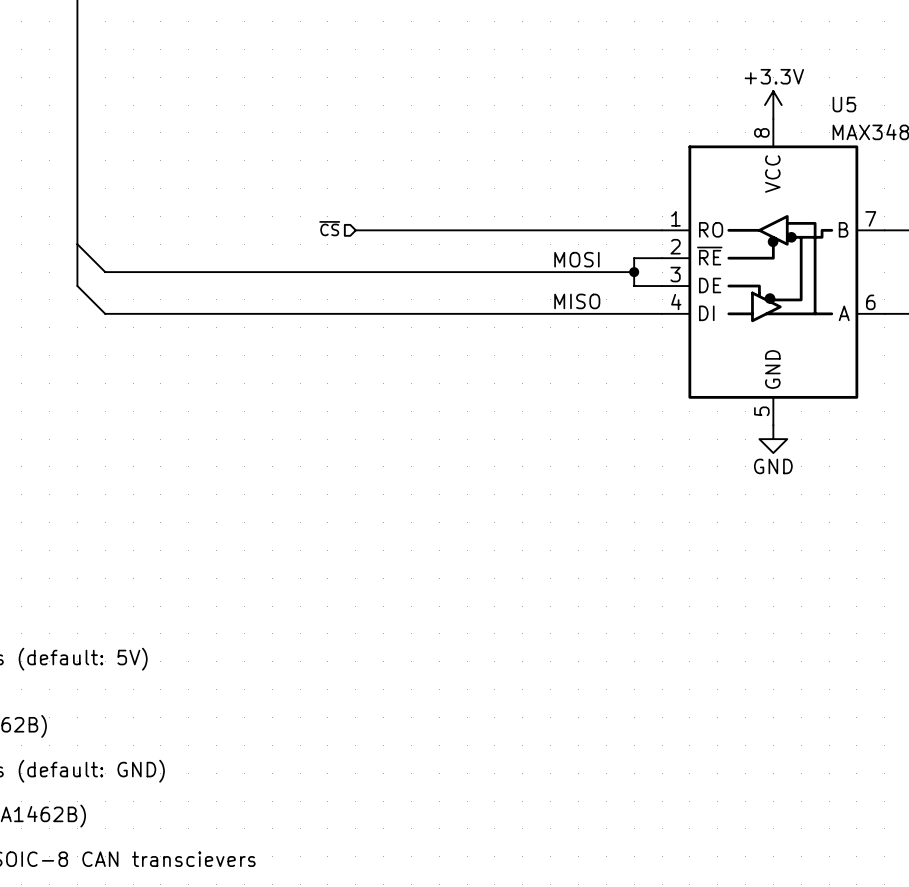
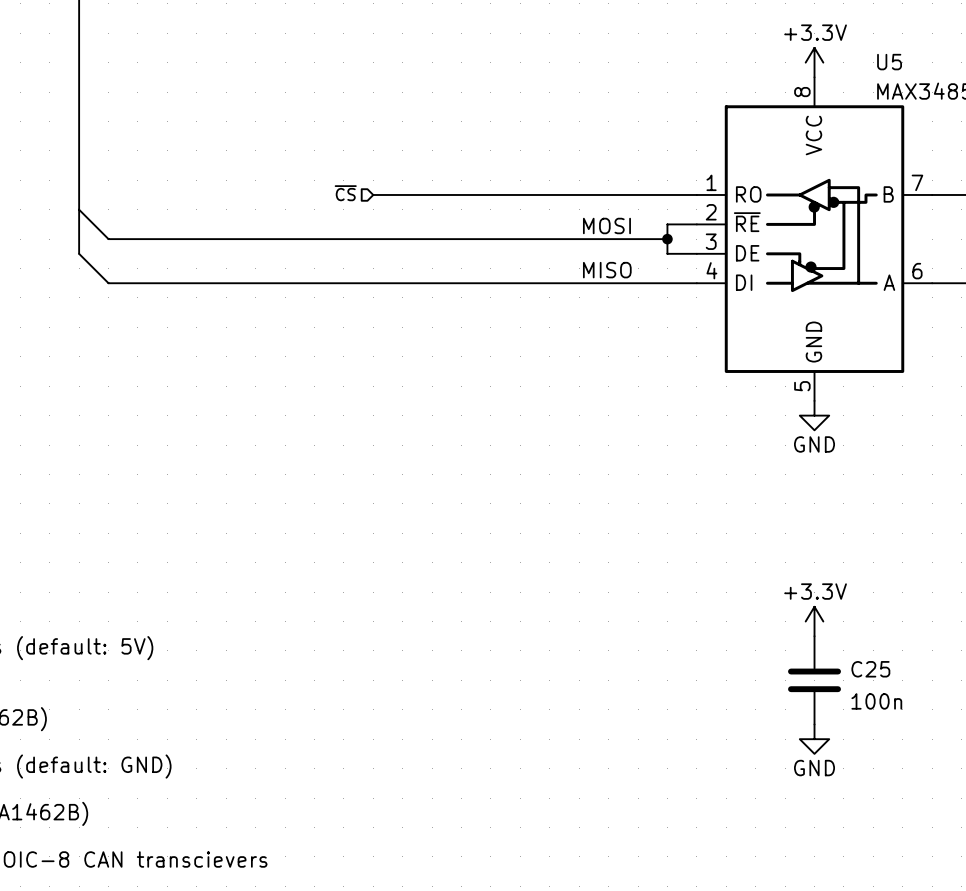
power symbol: none -> +3.3V (814, 621)
C25: none -> 100n (814, 680)
power symbol: none -> GND (814, 739)

